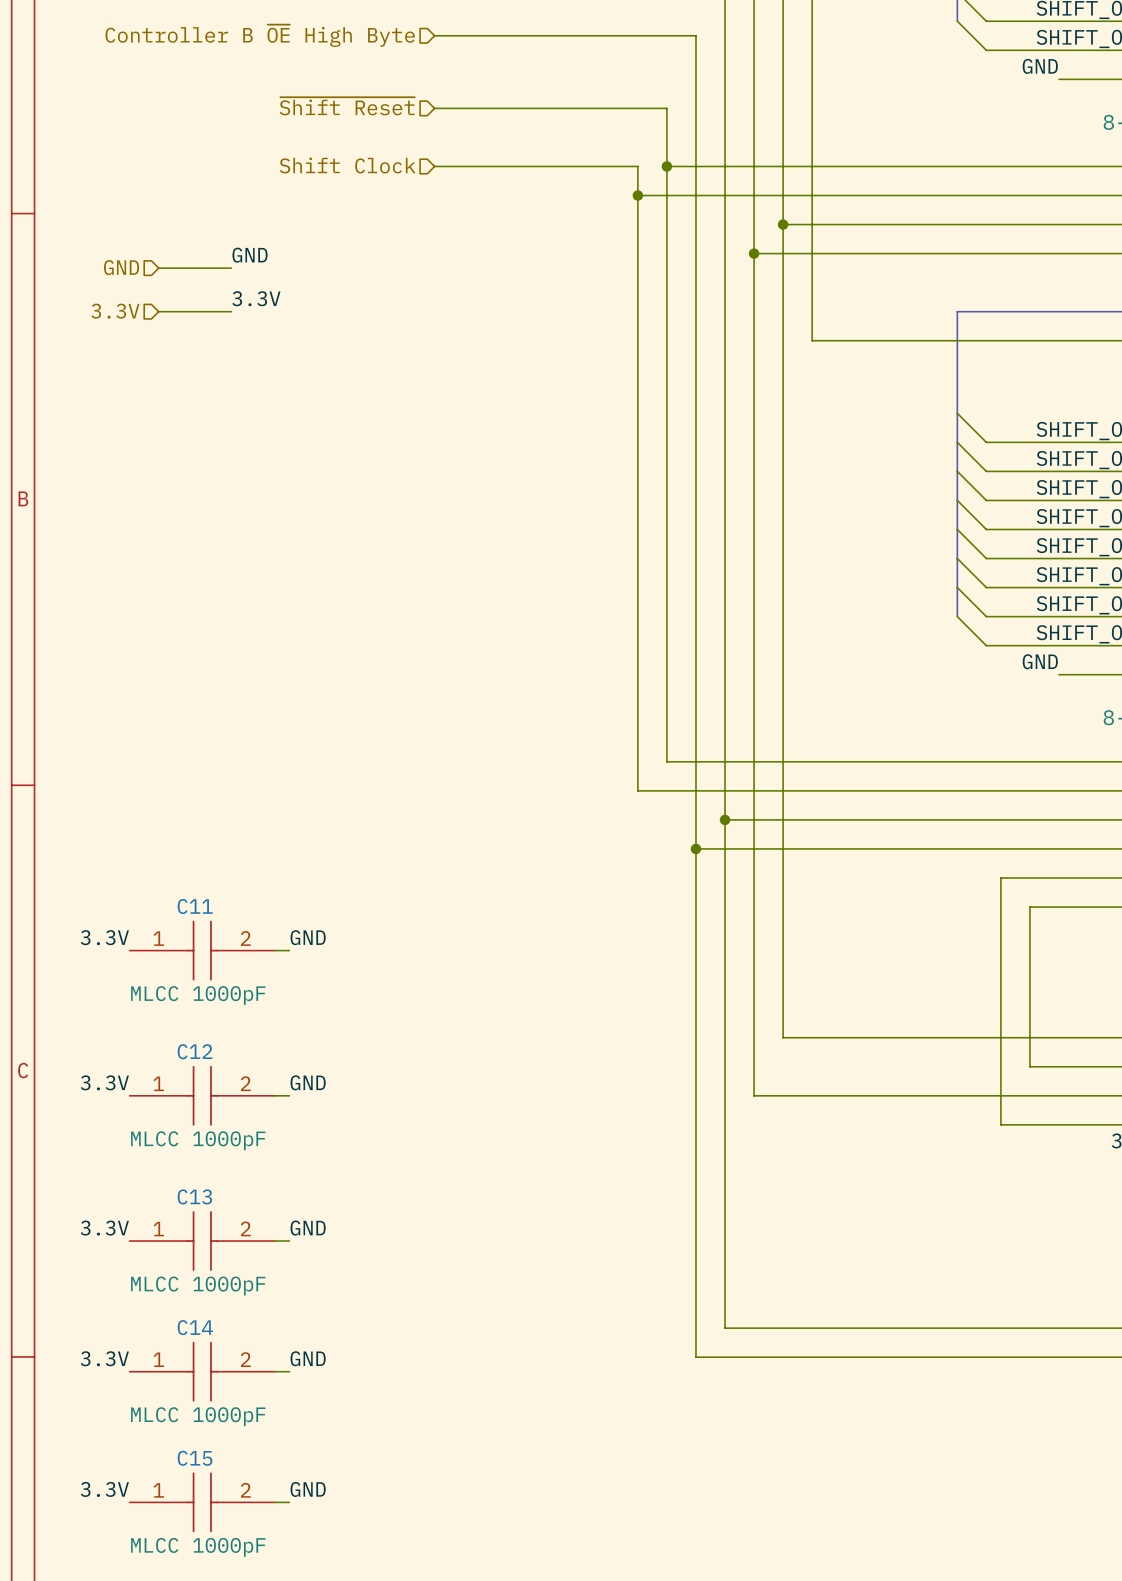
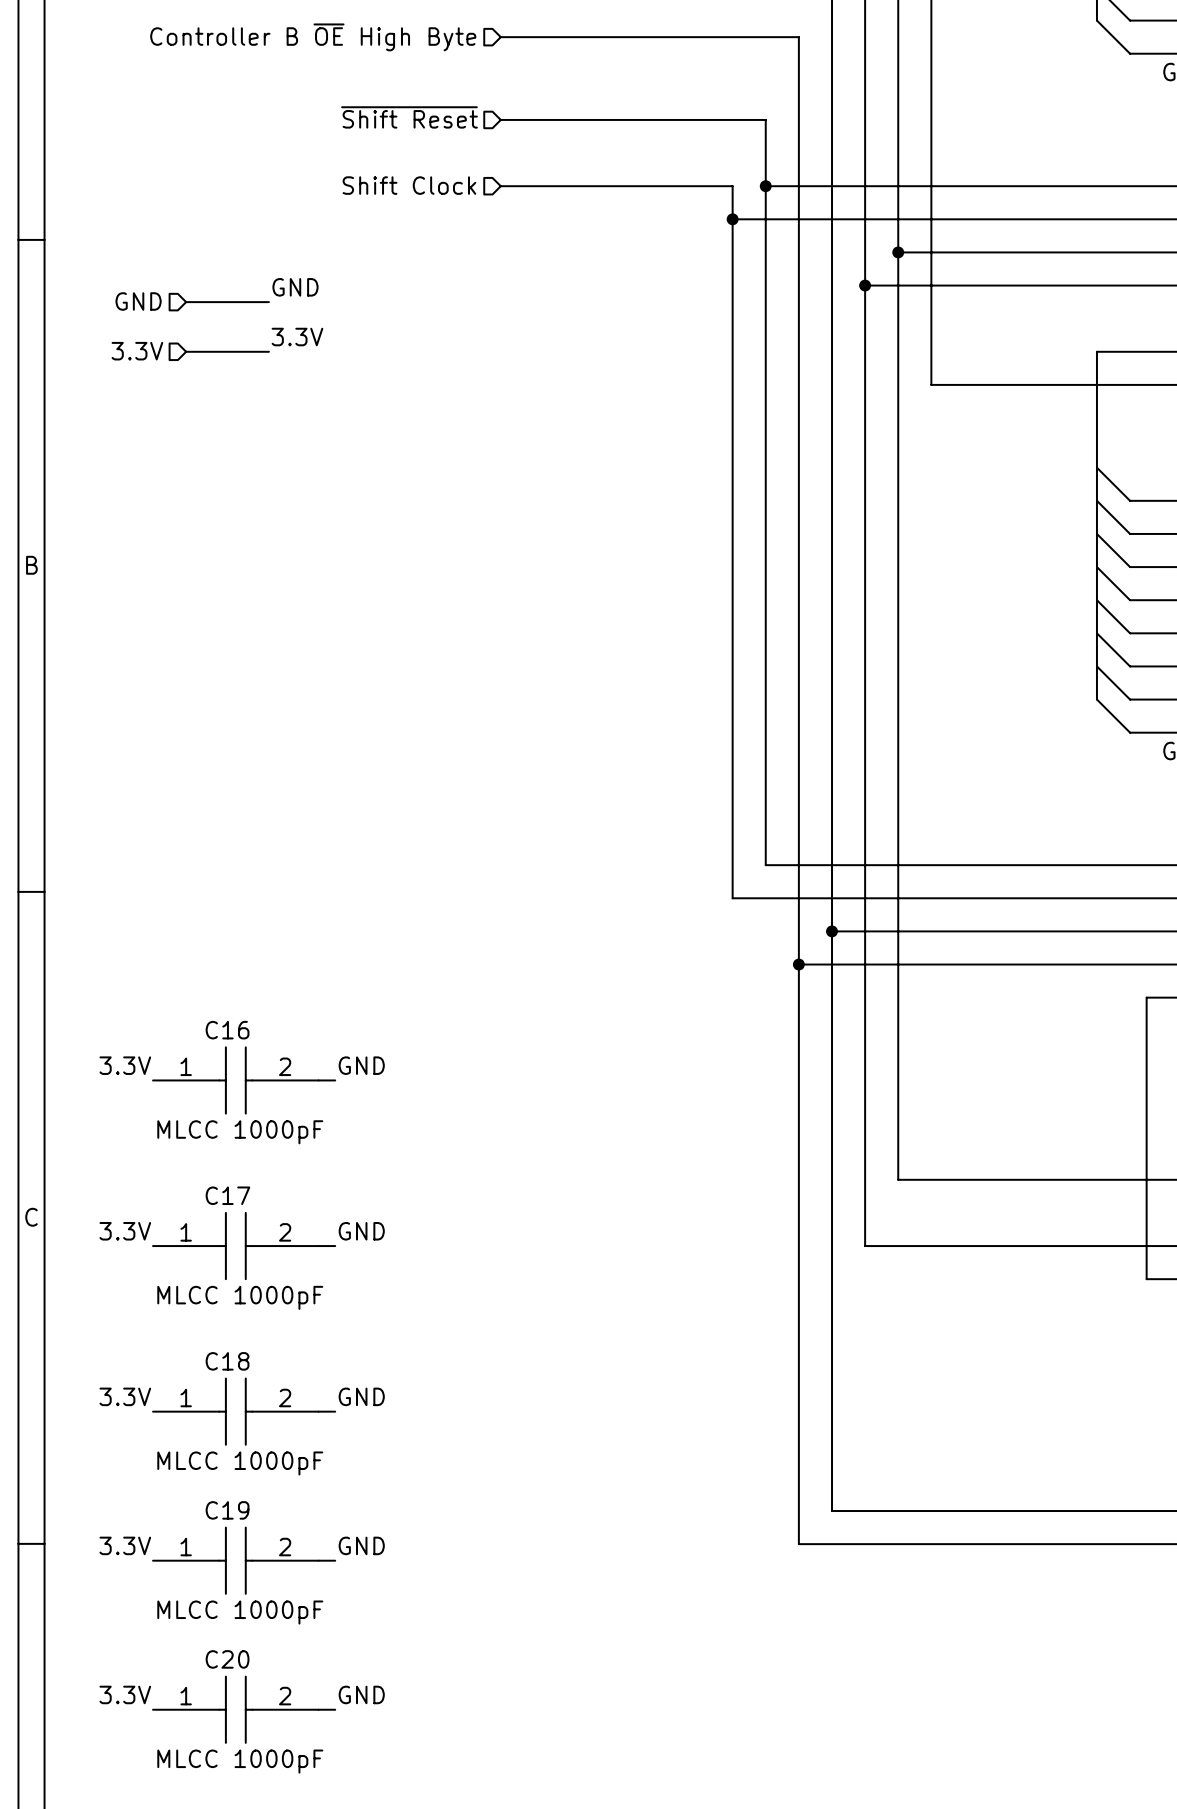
C11 name: C11 (195, 906) -> C16 (227, 1030)
C12 name: C12 (195, 1051) -> C17 (227, 1195)
C13 name: C13 (194, 1196) -> C18 (227, 1361)
C14 name: C14 (195, 1327) -> C19 (227, 1510)
C15 name: C15 (195, 1458) -> C20 (227, 1659)

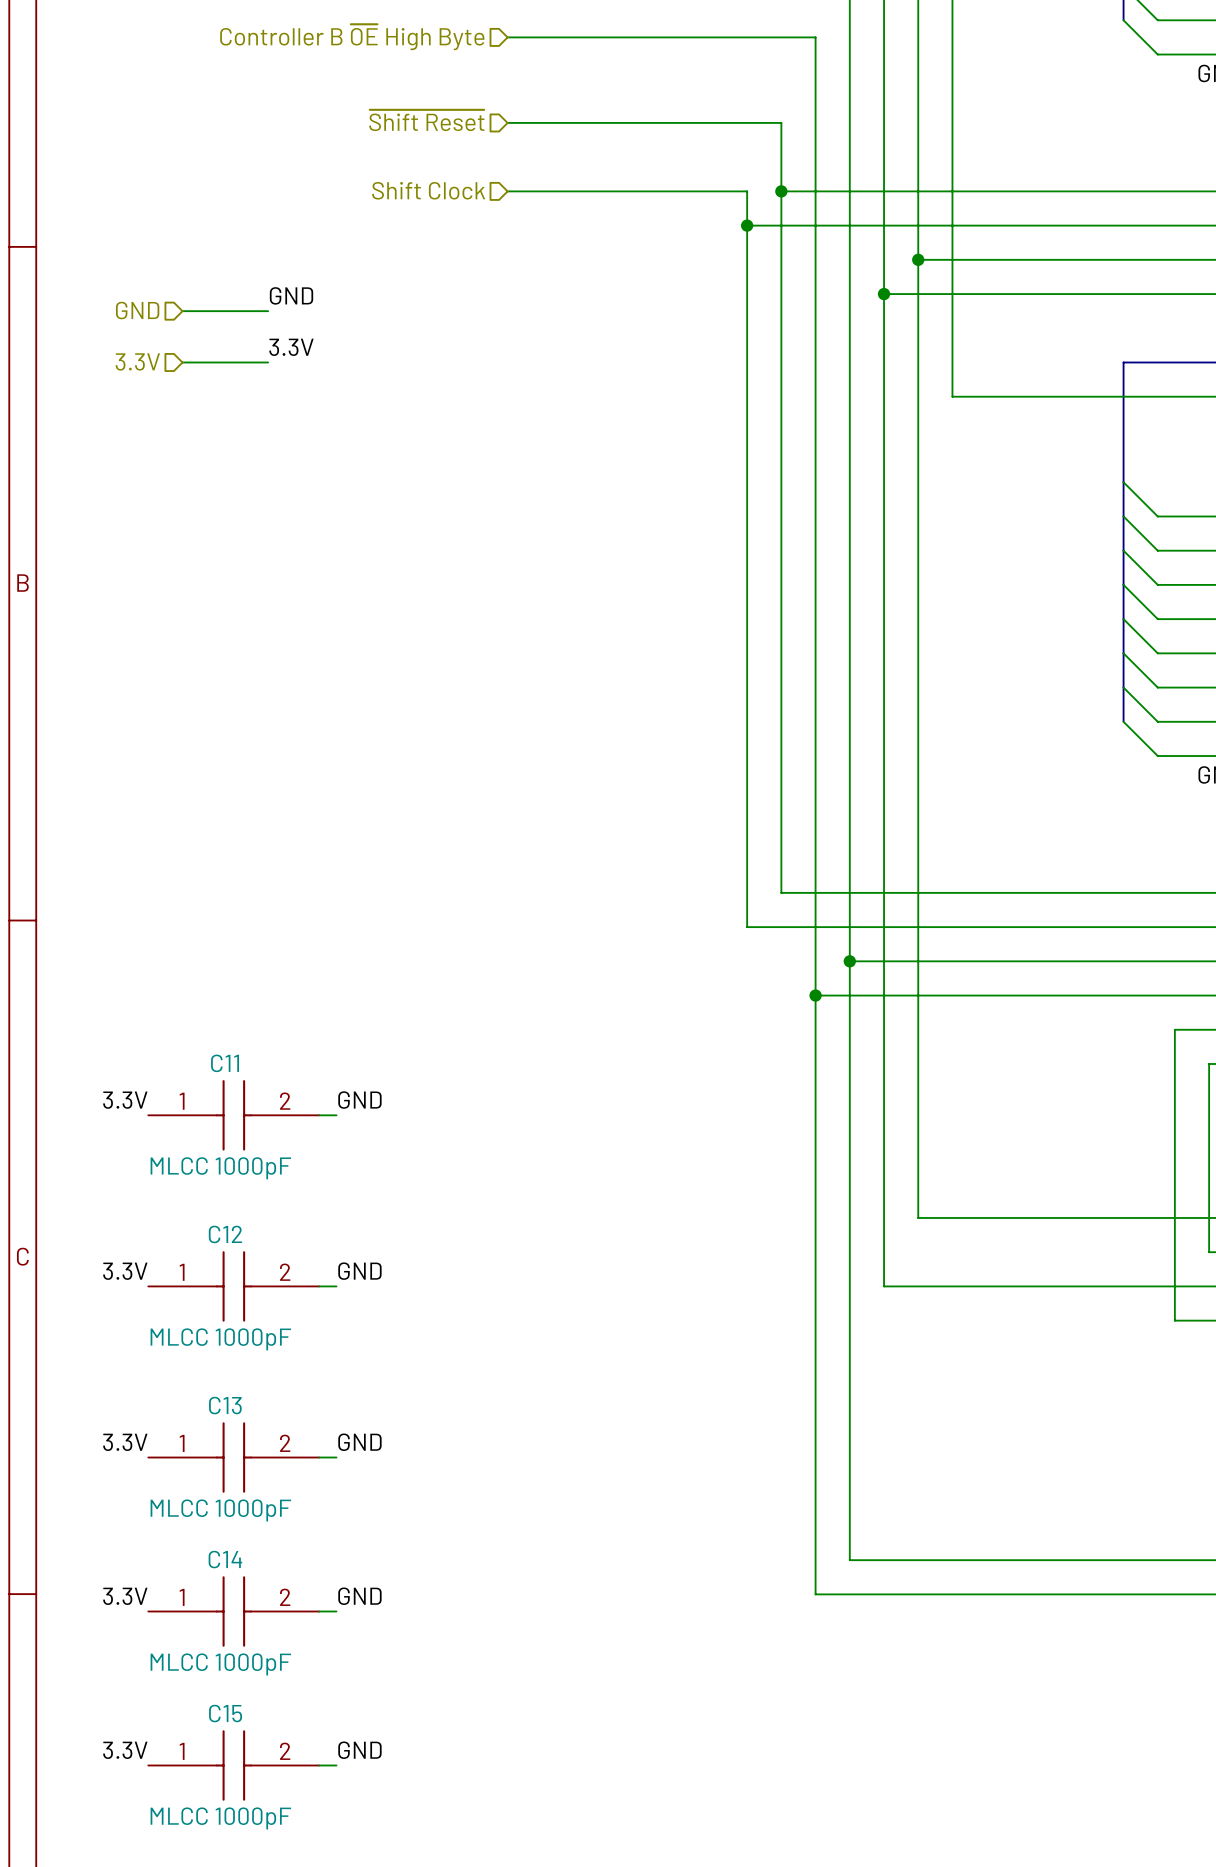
C16 name: C16 (227, 1030) -> C11 (225, 1063)
C17 name: C17 (227, 1195) -> C12 (225, 1234)
C18 name: C18 (227, 1361) -> C13 (225, 1405)
C19 name: C19 (227, 1510) -> C14 (225, 1559)
C20 name: C20 (227, 1659) -> C15 (225, 1713)

